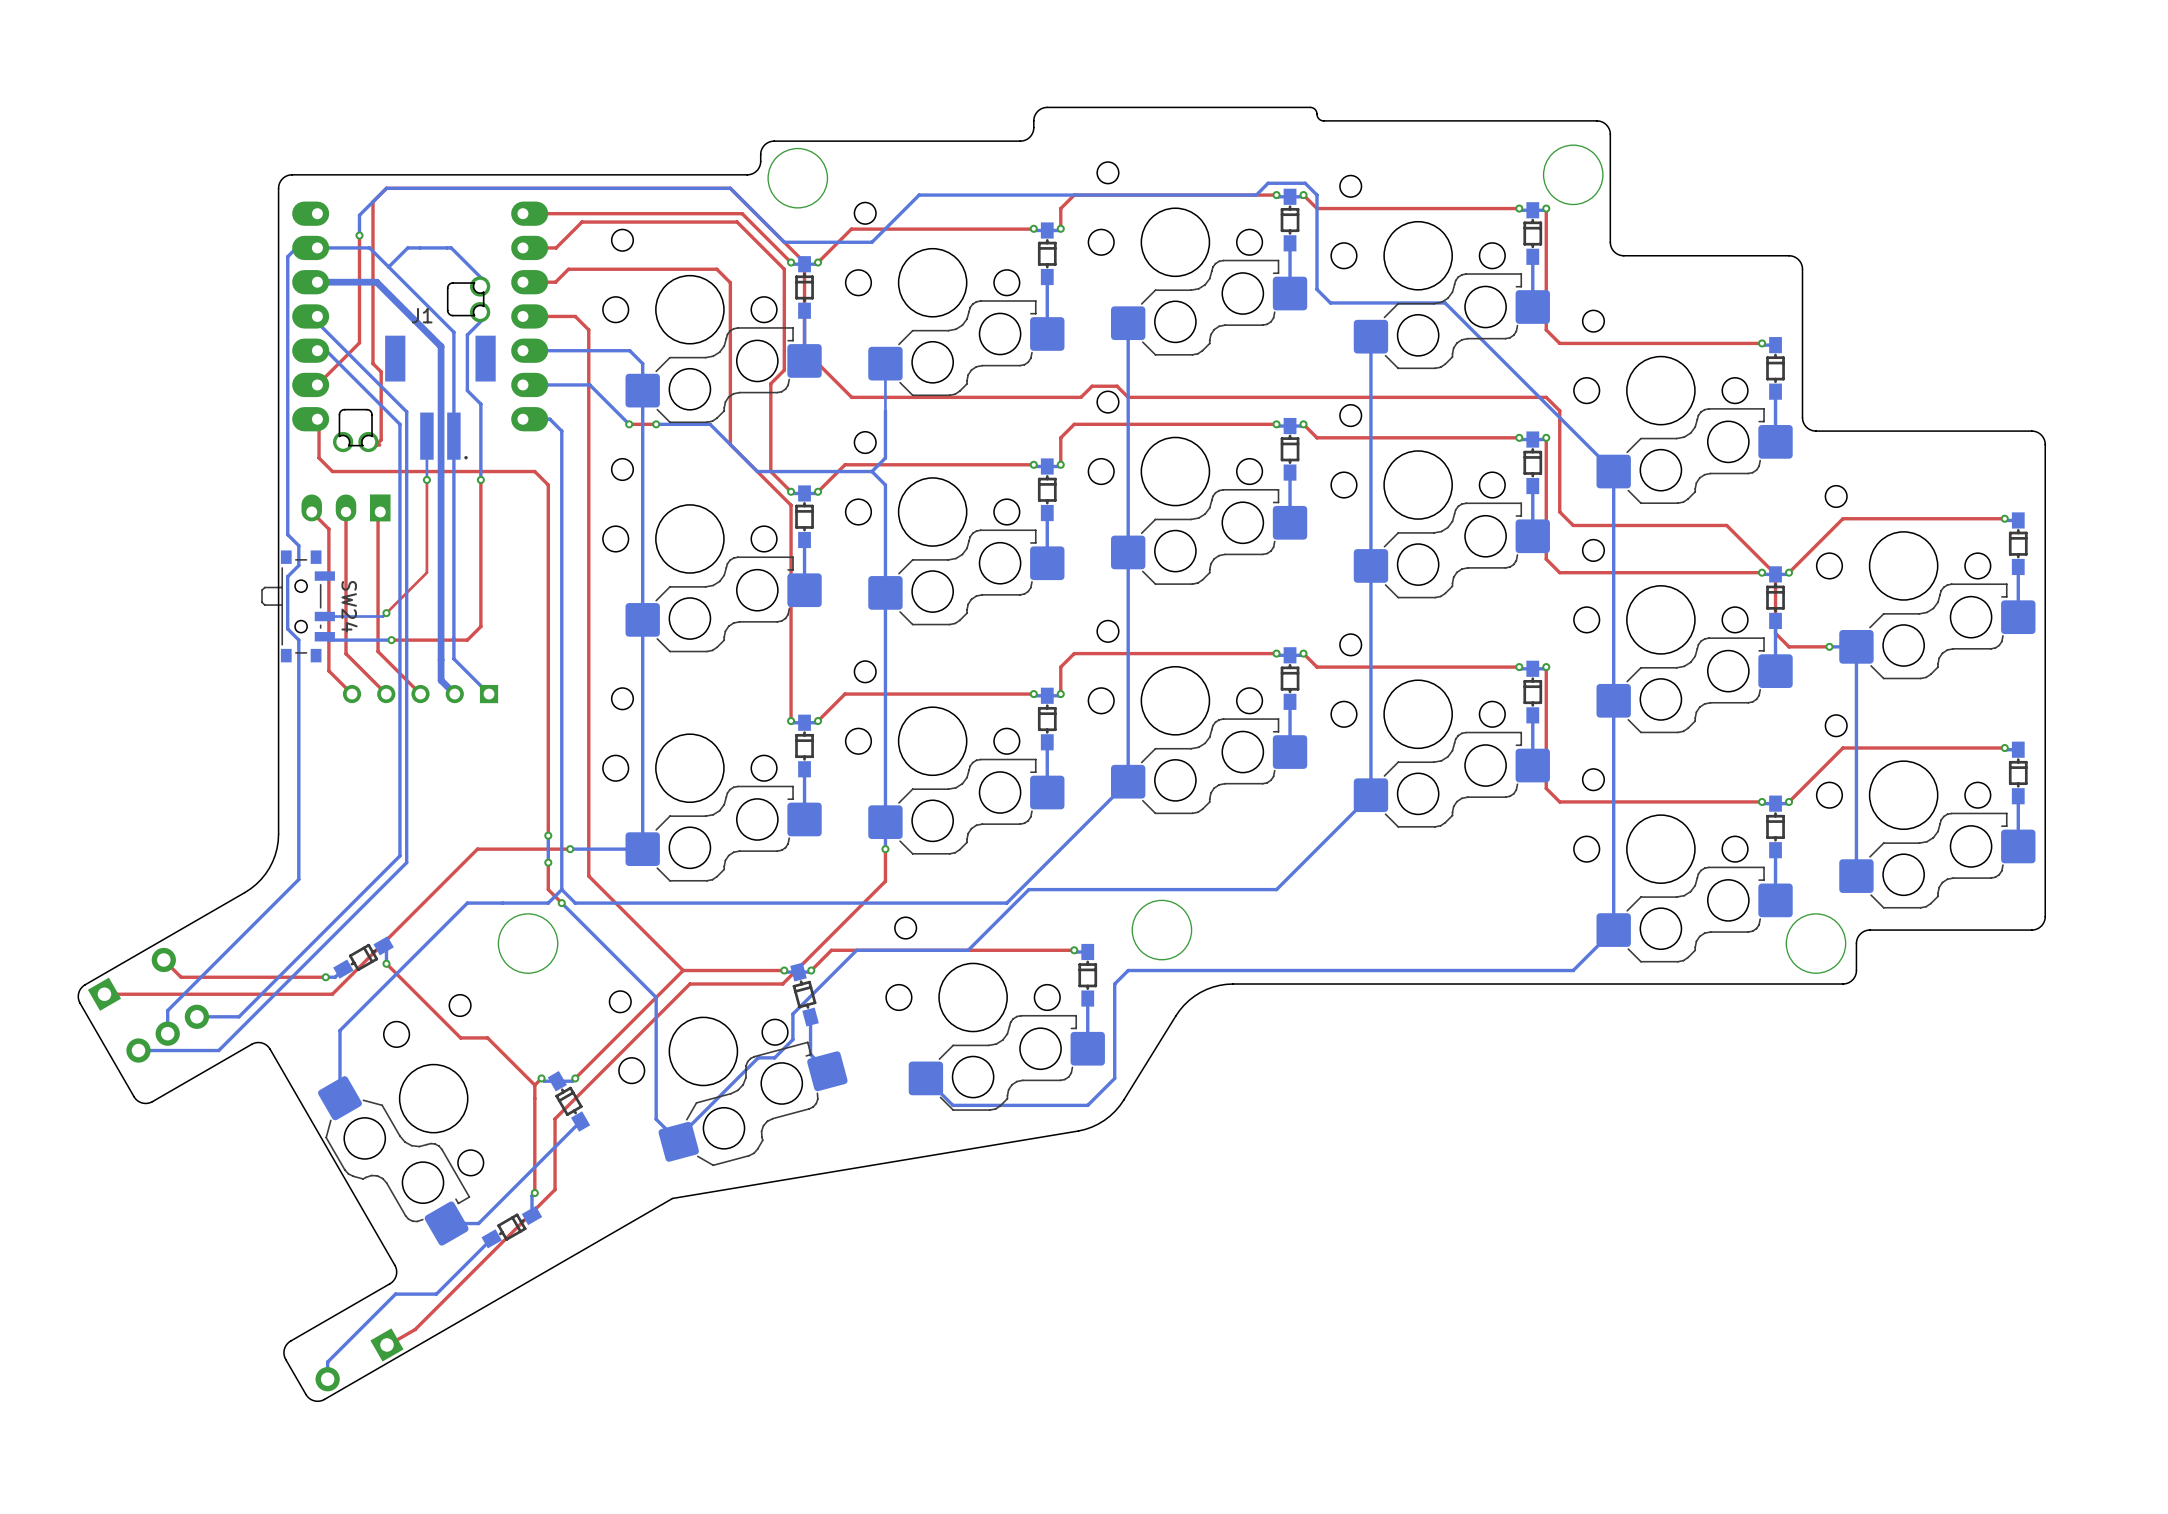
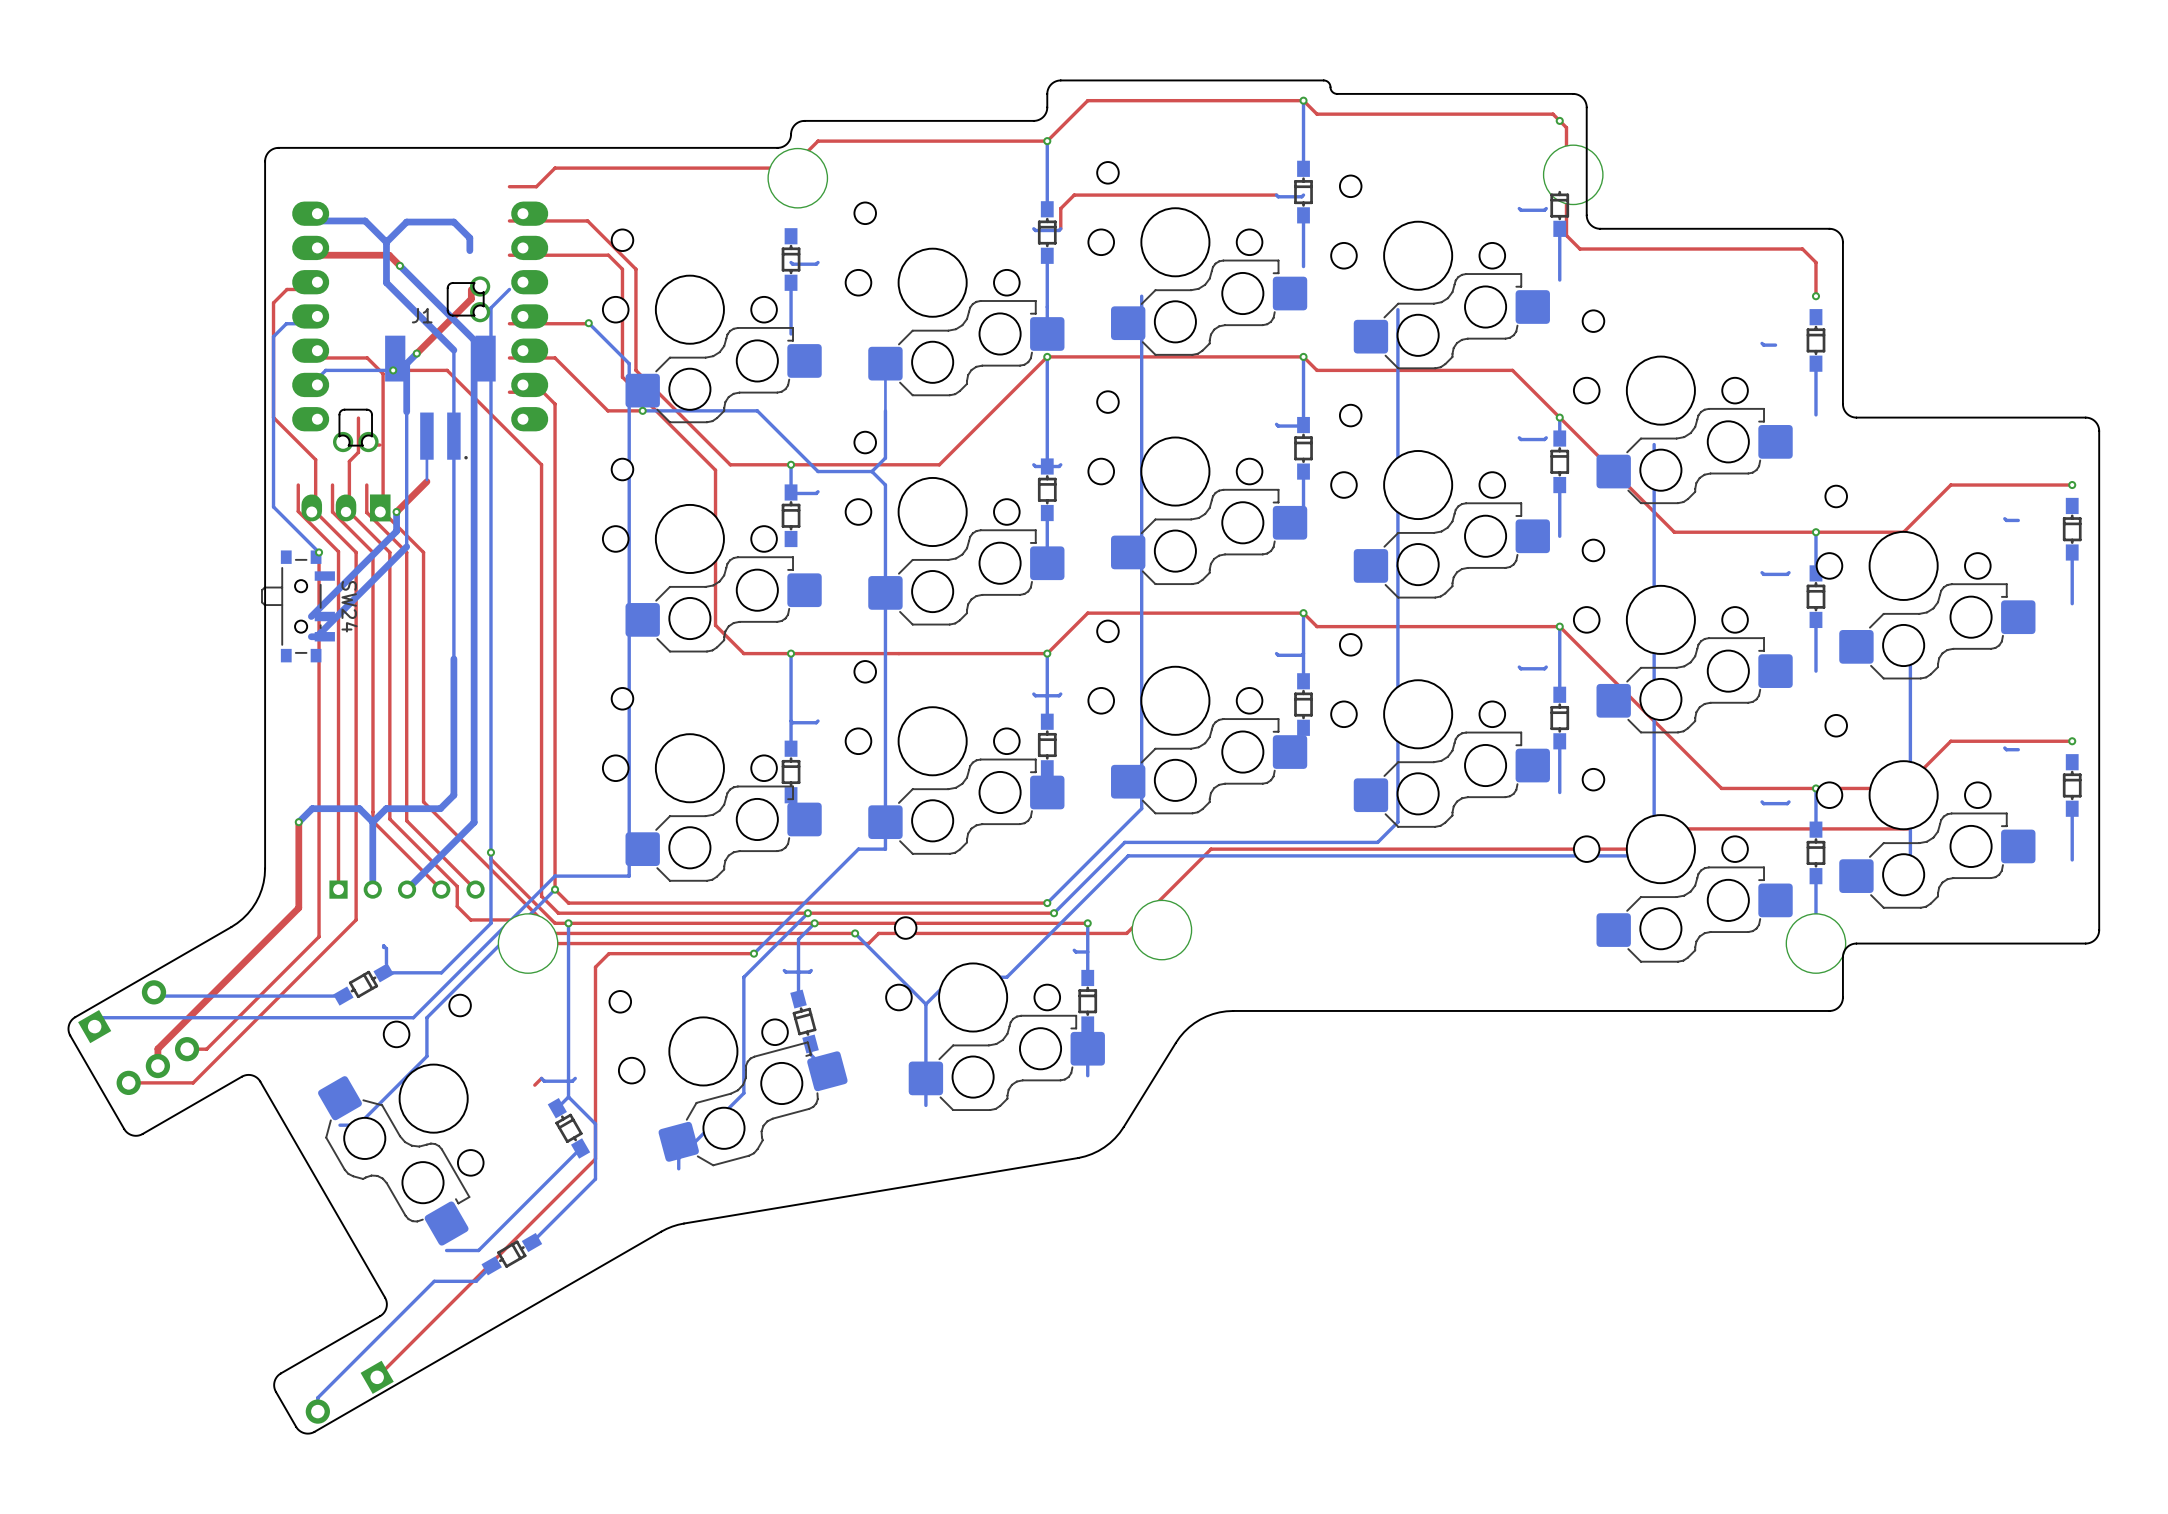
bottom track: none -> (1303, 100) (1303, 168)
via: none -> (1303, 100)
board edge: (1310, 107) (1045, 107) (1035, 113) (1032, 133) (1023, 140) (772, 141) (767, 143) (762, 148) (757, 169) (748, 174) (292, 174) (281, 179) (278, 188) (277, 848) (265, 873) (250, 888) (85, 984) (79, 990) (78, 997) (134, 1096) (142, 1102) (152, 1101) (253, 1043) (260, 1042) (266, 1045) (394, 1265) (396, 1275) (391, 1282) (286, 1345) (283, 1352) (285, 1358) (309, 1398) (315, 1401) (324, 1399) (672, 1198) (1078, 1131) (1092, 1127) (1109, 1116) (1119, 1105) (1184, 1005) (1194, 996) (1212, 987) (1233, 984) (1844, 983) (1851, 981) (1855, 974) (1856, 940) (1859, 935) (1865, 930) (2031, 930) (2042, 924) (2045, 916) (2045, 444) (2041, 435) (2031, 431) (1815, 431) (1807, 428) (1802, 417) (1802, 269) (1800, 262) (1794, 257) (1789, 255) (1623, 255) (1616, 253) (1612, 249) (1610, 242) (1610, 132) (1607, 125) (1602, 122) (1323, 120) (1318, 118) (1315, 109) (1310, 107) -> (1323, 80) (1329, 83) (1332, 91) (1337, 93) (1579, 95) (1584, 100) (1586, 105) (1586, 216) (1589, 223) (1595, 228) (1829, 228) (1836, 230) (1840, 235) (1842, 242) (1843, 405) (1845, 412) (1850, 416) (2085, 417) (2095, 421) (2099, 431) (2099, 930) (2096, 938) (2085, 943) (1853, 943) (1846, 947) (1843, 954) (1842, 1001) (1837, 1008) (1830, 1010) (1233, 1010) (1212, 1014) (1194, 1023) (1184, 1032) (1119, 1132) (1109, 1143) (1092, 1154) (1078, 1157) (672, 1226) (314, 1431) (307, 1433) (299, 1430) (275, 1390) (275, 1378) (280, 1373) (381, 1315) (386, 1307) (385, 1297) (256, 1077) (250, 1075) (243, 1075) (142, 1134) (132, 1135) (124, 1129) (70, 1035) (68, 1028) (70, 1022) (75, 1017) (237, 923) (252, 908) (263, 882) (265, 161) (268, 152) (278, 147) (779, 147) (788, 141) (793, 125) (803, 120) (1036, 120) (1042, 117) (1046, 111) (1049, 86) (1059, 80) (1323, 80)
via: none -> (1559, 120)
bottom track: none -> (1047, 141) (1047, 209)
via: none -> (1047, 141)
top track: none -> (509, 186) (536, 186) (555, 168) (791, 168) (818, 141) (1047, 141) (1087, 100) (1303, 100) (1317, 114) (1553, 114) (1566, 127) (1566, 235) (1579, 249) (1802, 249) (1815, 262) (1815, 296)
via: (1276, 195) -> none
top track: (1303, 195) (1317, 208) (1519, 208) -> none
via: (1303, 195) -> none
via: (1519, 208) -> none
top track: (1546, 208) (1546, 329) (1559, 343) (1762, 343) -> none
via: (1546, 208) -> none
top track: (522, 213) (742, 213) (791, 262) -> none
bottom track: none -> (1303, 215) (1303, 266)
bottom track: none -> (303, 220) (365, 220) (386, 242)
part position: (1290, 220) -> (1303, 192)
top track: (1033, 228) (851, 229) (818, 262) -> none
via: (1033, 228) -> none
via: (1060, 228) -> none
bottom track: none -> (1559, 228) (1559, 280)
part position: (1532, 233) -> (1559, 205)
top track: (359, 235) (359, 342) (317, 384) -> none
bottom track: (359, 235) (359, 215) (386, 188) (730, 188) (784, 242) (871, 242) (919, 195) (1256, 195) (1268, 183) (1305, 183) (1317, 195) (1317, 289) (1330, 302) (1445, 302) (1613, 471) (1613, 930) (1573, 970) (1128, 970) (1114, 984) (1114, 1078) (1087, 1105) (952, 1105) (925, 1078) -> none
via position: (359, 235) -> (399, 265)
bottom track: none -> (386, 242) (406, 222) (453, 222) (469, 237) (469, 250)
bottom track: (1290, 243) (1290, 293) -> none
part position: (1047, 253) -> (1047, 232)
top track: none -> (303, 255) (389, 255) (399, 265)
top track: none -> (509, 255) (608, 255) (622, 269) (622, 377) (715, 470) (715, 625) (743, 653) (1047, 653) (1087, 613) (1303, 613) (1317, 626) (1559, 626) (1721, 788) (1903, 788) (1950, 741) (2072, 741)
bottom track: none -> (1047, 255) (1047, 277)
top track: (531, 256) (522, 247) (556, 247) (582, 222) (737, 222) (784, 269) (784, 370) (770, 383) (770, 471) (791, 491) -> none
bottom track: (1532, 256) (1532, 307) -> none
via: (791, 262) -> none
via: (818, 262) -> none
bottom track: none -> (399, 265) (474, 340) (474, 822) (407, 889)
bottom track: (388, 267) (407, 247) (451, 247) (482, 279) -> none
bottom track: (317, 282) (376, 282) (441, 346) (441, 680) (454, 694) -> none
top track: (522, 282) (555, 282) (568, 269) (716, 269) (730, 282) (730, 444) (791, 505) (791, 721) -> none
bottom track: none -> (791, 282) (791, 333)
part position: (804, 287) -> (791, 259)
top track: none -> (303, 289) (287, 289) (273, 302) (273, 417) (315, 459) (315, 511) (356, 552) (356, 919) (193, 1082) (128, 1082)
top track: none -> (471, 289) (471, 299) (416, 353)
bottom track: none -> (509, 289) (490, 307) (490, 923) (441, 972) (383, 972)
bottom track: none -> (1141, 296) (1141, 808) (1047, 903)
bottom track: none -> (1397, 309) (1397, 822) (1377, 842) (1124, 842) (1054, 913)
bottom track: (804, 310) (804, 360) -> none
bottom track: (483, 315) (483, 318) (467, 334) (467, 390) (480, 404) (480, 479) -> none
bottom track: (315, 316) (317, 316) (317, 322) (406, 411) -> (416, 353) (406, 363) (406, 411)
top track: (522, 316) (575, 316) (588, 329) (588, 876) (683, 970) -> none
bottom track: none -> (303, 323) (286, 323) (273, 336) (273, 506) (319, 552)
top track: none -> (588, 323) (509, 323)
bottom track: none -> (588, 323) (629, 363) (629, 876) (555, 876) (413, 1017) (103, 1017) (94, 1026)
via: none -> (588, 323)
bottom track: (1128, 323) (1128, 781) (1006, 903) (575, 903) (561, 889) -> none
bottom track: (1370, 336) (1370, 795) (1276, 889) (1028, 889) (968, 950) (856, 950) (792, 1014) (792, 1039) (774, 1057) (758, 1057) (678, 1137) (678, 1141) (656, 1119) (656, 997) (561, 903) -> none
via position: (1762, 343) -> (1815, 296)
bottom track: (315, 350) (326, 350) (399, 424) (399, 855) (239, 1016) (196, 1016) -> none
bottom track: (453, 350) (453, 332) (369, 247) (296, 247) (287, 256) (287, 534) (298, 545) (298, 565) (287, 576) (287, 628) (298, 640) (298, 879) (167, 1010) (167, 1033) -> (453, 350) (386, 282) (386, 242)
bottom track: (522, 350) (629, 350) (642, 363) (642, 849) (570, 849) -> none
via: none -> (416, 353)
bottom track: none -> (1047, 356) (1047, 465)
via: none -> (1047, 356)
bottom track: none -> (1303, 356) (1303, 425)
via: none -> (1303, 356)
top track: none -> (509, 357) (555, 357) (607, 410) (642, 410)
top track: (372, 363) (372, 201) (386, 188) (730, 188) (804, 262) (804, 350) (851, 397) (1080, 397) (1092, 386) (1117, 386) (1128, 397) (1546, 397) (1559, 410) (1559, 511) (1573, 525) (1726, 525) (1775, 574) (1775, 633) (1789, 646) (1829, 646) -> (372, 363) (367, 357) (303, 357)
bottom track: none -> (1815, 363) (1815, 414)
part position: (1775, 368) -> (1815, 340)
top track: none -> (393, 370) (447, 370) (541, 464) (541, 896) (558, 913) (1054, 913)
bottom track: none -> (393, 370) (325, 370) (303, 392)
via: none -> (393, 370)
top track: (381, 371) (381, 440) (375, 445) (371, 445) -> (381, 371) (383, 373) (383, 511) (423, 552) (423, 801) (555, 933) (855, 933)
bottom track: (522, 384) (589, 384) (629, 424) -> none
bottom track: (1775, 391) (1775, 441) -> none
top track: none -> (509, 392) (543, 392) (555, 404) (555, 889) (568, 903) (1047, 903)
via: none -> (642, 410)
bottom track: none -> (1559, 417) (1559, 438)
via: none -> (1559, 417)
top track: none -> (358, 418) (358, 452) (349, 461) (349, 511) (389, 552) (389, 819) (457, 886) (457, 906) (470, 919) (529, 919) (553, 943) (868, 943) (878, 933) (1126, 933) (1211, 849) (1654, 849) (1674, 828) (1910, 828)
top track: (317, 419) (319, 420) (319, 458) (332, 471) (534, 471) (548, 485) (548, 835) -> none
bottom track: (522, 419) (549, 419) (561, 431) (561, 889) -> none
via: (629, 424) -> none
top track: (656, 424) (629, 424) -> none
bottom track: (656, 424) (710, 424) (757, 471) (818, 471) -> (642, 410) (757, 410) (818, 471)
via: (656, 424) -> none
top track: (1276, 424) (1074, 424) (1060, 437) (1060, 464) -> none
via: (1276, 424) -> none
top track: (1303, 424) (1317, 437) (1519, 437) -> none
via: (1303, 424) -> none
via: (1519, 437) -> none
top track: (1546, 437) (1546, 559) (1559, 572) (1762, 572) -> none
via: (1546, 437) -> none
bottom track: none -> (1654, 444) (1654, 842) (1640, 855) (1128, 855) (1006, 977) (952, 977) (925, 1004)
part position: (1290, 449) -> (1303, 448)
part position: (1532, 462) -> (1559, 461)
bottom track: none -> (791, 464) (791, 492)
via: none -> (791, 464)
top track: (844, 464) (818, 491) -> (844, 464) (730, 464) (635, 370) (635, 269) (587, 220) (509, 220)
top track: (1033, 464) (939, 464) -> (2072, 485) (1950, 485) (1903, 532) (1674, 532) (1512, 370) (1317, 370) (1303, 356) (1047, 356) (939, 464)
via: (1033, 464) -> none
via: (1060, 464) -> none
bottom track: none -> (1303, 471) (1303, 522)
bottom track: (1290, 472) (1290, 522) -> none
via position: (426, 479) -> (396, 511)
top track: (480, 479) (480, 626) (467, 640) (391, 640) -> none
via: (480, 479) -> none
top track: (426, 481) (426, 572) (386, 613) -> (426, 481) (396, 511)
top track: none -> (298, 485) (298, 511) (338, 551) (338, 889)
top track: none -> (332, 485) (332, 511) (372, 552) (372, 821) (441, 889)
top track: none -> (366, 485) (366, 512) (406, 552) (406, 820) (475, 889)
bottom track: none -> (1559, 485) (1559, 536)
bottom track: (1532, 486) (1532, 536) -> none
via: (791, 491) -> none
via: (818, 491) -> none
top track: (311, 511) (328, 529) (328, 670) (352, 694) -> none
top track: (346, 511) (346, 653) (386, 694) -> none
top track: (380, 511) (378, 514) (378, 651) (420, 694) -> none
bottom track: none -> (396, 511) (396, 531) (311, 616)
part position: (804, 516) -> (791, 515)
top track: (2004, 518) (1842, 518) (1789, 572) -> none
via position: (2004, 518) -> (2072, 485)
bottom track: none -> (1815, 532) (1815, 573)
via: none -> (1815, 532)
bottom track: (804, 540) (804, 590) -> none
part position: (2018, 543) -> (2072, 529)
bottom track: (406, 546) (406, 862) (218, 1050) (138, 1050) -> (406, 546) (316, 636) (311, 636)
top track: none -> (319, 552) (319, 936) (206, 1049) (187, 1049)
via: none -> (319, 552)
bottom track: none -> (2072, 552) (2072, 603)
bottom track: (2018, 566) (2018, 617) -> none
via: (1762, 572) -> none
via: (1789, 572) -> none
part position: (1775, 597) -> (1815, 596)
bottom track: (386, 613) (383, 616) (324, 616) -> none
via: (386, 613) -> none
bottom track: none -> (1303, 613) (1303, 681)
via: none -> (1303, 613)
bottom track: none -> (1815, 619) (1815, 671)
bottom track: (1775, 620) (1775, 671) -> none
bottom track: none -> (1559, 626) (1559, 694)
via: none -> (1559, 626)
bottom track: none -> (1910, 633) (1910, 889)
bottom track: (324, 636) (328, 640) (391, 640) -> none
via: (391, 640) -> none
bottom track: (1829, 646) (1856, 646) (1856, 876) -> none
via: (1829, 646) -> none
bottom track: none -> (791, 653) (791, 748)
via: none -> (791, 653)
bottom track: none -> (1047, 653) (1047, 721)
via: none -> (1047, 653)
top track: (1276, 653) (1074, 653) (1060, 667) (1060, 694) -> none
via: (1276, 653) -> none
top track: (1303, 653) (1317, 667) (1519, 667) -> none
via: (1303, 653) -> none
bottom track: (453, 658) (489, 694) -> (453, 658) (453, 795) (440, 808) (386, 808) (372, 822) (372, 889)
via: (1519, 667) -> none
top track: (1546, 667) (1546, 788) (1559, 801) (1762, 801) -> none
via: (1546, 667) -> none
part position: (1290, 678) -> (1303, 704)
part position: (1532, 692) -> (1559, 718)
part rotation: 0° (420, 694) -> 180° (407, 889)
part position: (420, 694) -> (407, 889)
top track: (1033, 694) (844, 694) (818, 721) -> none
via: (1033, 694) -> none
via: (1060, 694) -> none
bottom track: (1290, 701) (1290, 752) -> none
bottom track: (1532, 715) (1532, 765) -> none
part position: (1047, 719) -> (1047, 745)
via: (791, 721) -> none
via: (818, 721) -> none
bottom track: none -> (1559, 741) (1559, 792)
bottom track: (1047, 742) (1047, 768) -> none
part position: (804, 746) -> (791, 771)
top track: (2004, 748) (1842, 748) (1789, 801) -> none
via position: (2004, 748) -> (2072, 741)
bottom track: (804, 769) (804, 819) -> none
part position: (2018, 772) -> (2072, 785)
bottom track: none -> (1815, 788) (1815, 829)
via: none -> (1815, 788)
bottom track: (2018, 796) (2018, 846) -> none
via: (1762, 801) -> none
via: (1789, 801) -> none
bottom track: none -> (2072, 808) (2072, 859)
bottom track: none -> (372, 821) (359, 808) (312, 808) (298, 822)
top track: none -> (298, 822) (298, 907) (157, 1048) (157, 1066)
via: none -> (298, 822)
part position: (1775, 826) -> (1815, 852)
bottom track: (548, 835) (548, 862) -> none
via: (548, 835) -> none
top track: (570, 849) (477, 849) (332, 994) (104, 994) -> none
via: (570, 849) -> none
top track: (885, 849) (885, 881) (782, 984) (689, 984) (555, 1118) (555, 1189) (415, 1329) (386, 1344) -> none
bottom track: none -> (885, 849) (858, 849) (753, 953)
via: (885, 849) -> none
bottom track: (1775, 850) (1775, 900) -> none
top track: none -> (490, 852) (490, 859) (555, 923) (1087, 923)
via: none -> (490, 852)
top track: (548, 862) (548, 889) (561, 903) -> none
via: (548, 862) -> none
bottom track: none -> (1815, 876) (1815, 927)
bottom track: none -> (555, 889) (426, 1017) (426, 1056) (358, 1125) (339, 1125)
via: none -> (555, 889)
bottom track: (561, 889) (548, 903) (467, 903) (339, 1030) (339, 1098) -> none
via: (561, 903) -> none
via: none -> (1047, 903)
bottom track: none -> (807, 913) (743, 977) (743, 1093) (678, 1158) (678, 1168)
via: none -> (807, 913)
via: none -> (1054, 913)
bottom track: none -> (568, 923) (568, 1097)
via: none -> (568, 923)
bottom track: none -> (814, 923) (798, 939) (798, 999)
via: none -> (814, 923)
bottom track: none -> (1087, 923) (1087, 977)
via: none -> (1087, 923)
bottom track: none -> (855, 933) (925, 1004)
via: none -> (855, 933)
top track: (1074, 950) (831, 950) (811, 970) -> none
via: (1074, 950) -> none
top track: none -> (753, 953) (608, 953) (595, 967) (595, 1159) (377, 1377)
via: none -> (753, 953)
part position: (363, 957) -> (363, 984)
top track: (163, 959) (181, 977) (325, 977) -> none
top track: (386, 963) (460, 1037) (487, 1037) (534, 1085) (534, 1193) -> none
via: (386, 963) -> none
bottom track: (343, 969) (335, 977) (325, 977) -> none
top track: (683, 970) (575, 1078) -> none
top track: (784, 970) (683, 970) -> none
via: (784, 970) -> none
via: (811, 970) -> none
part position: (1087, 975) -> (1087, 1001)
via: (325, 977) -> none
part position: (131, 979) -> (122, 1011)
bottom track: none -> (154, 992) (157, 996) (343, 996)
part position: (804, 994) -> (804, 1021)
bottom track: (1087, 998) (1087, 1024) -> none
bottom track: none -> (925, 1004) (925, 1105)
bottom track: (810, 1017) (810, 1044) -> (1087, 1048) (1087, 1075)
part position: (167, 1033) -> (157, 1066)
via: (541, 1078) -> none
via: (575, 1078) -> none
bottom track: none -> (568, 1097) (595, 1123) (595, 1179) (532, 1242)
bottom track: none -> (568, 1097) (557, 1108)
part position: (568, 1101) -> (568, 1128)
bottom track: (580, 1121) (478, 1223) (446, 1223) -> (580, 1148) (478, 1250) (446, 1250)
bottom track: (534, 1193) (532, 1195) (532, 1215) -> none
via: (534, 1193) -> none
part position: (511, 1227) -> (511, 1254)
bottom track: (491, 1238) (436, 1294) (395, 1294) (327, 1362) (327, 1379) -> none
bottom track: none -> (491, 1265) (476, 1281) (434, 1281) (317, 1397) (317, 1411)
part position: (359, 1359) -> (349, 1392)

